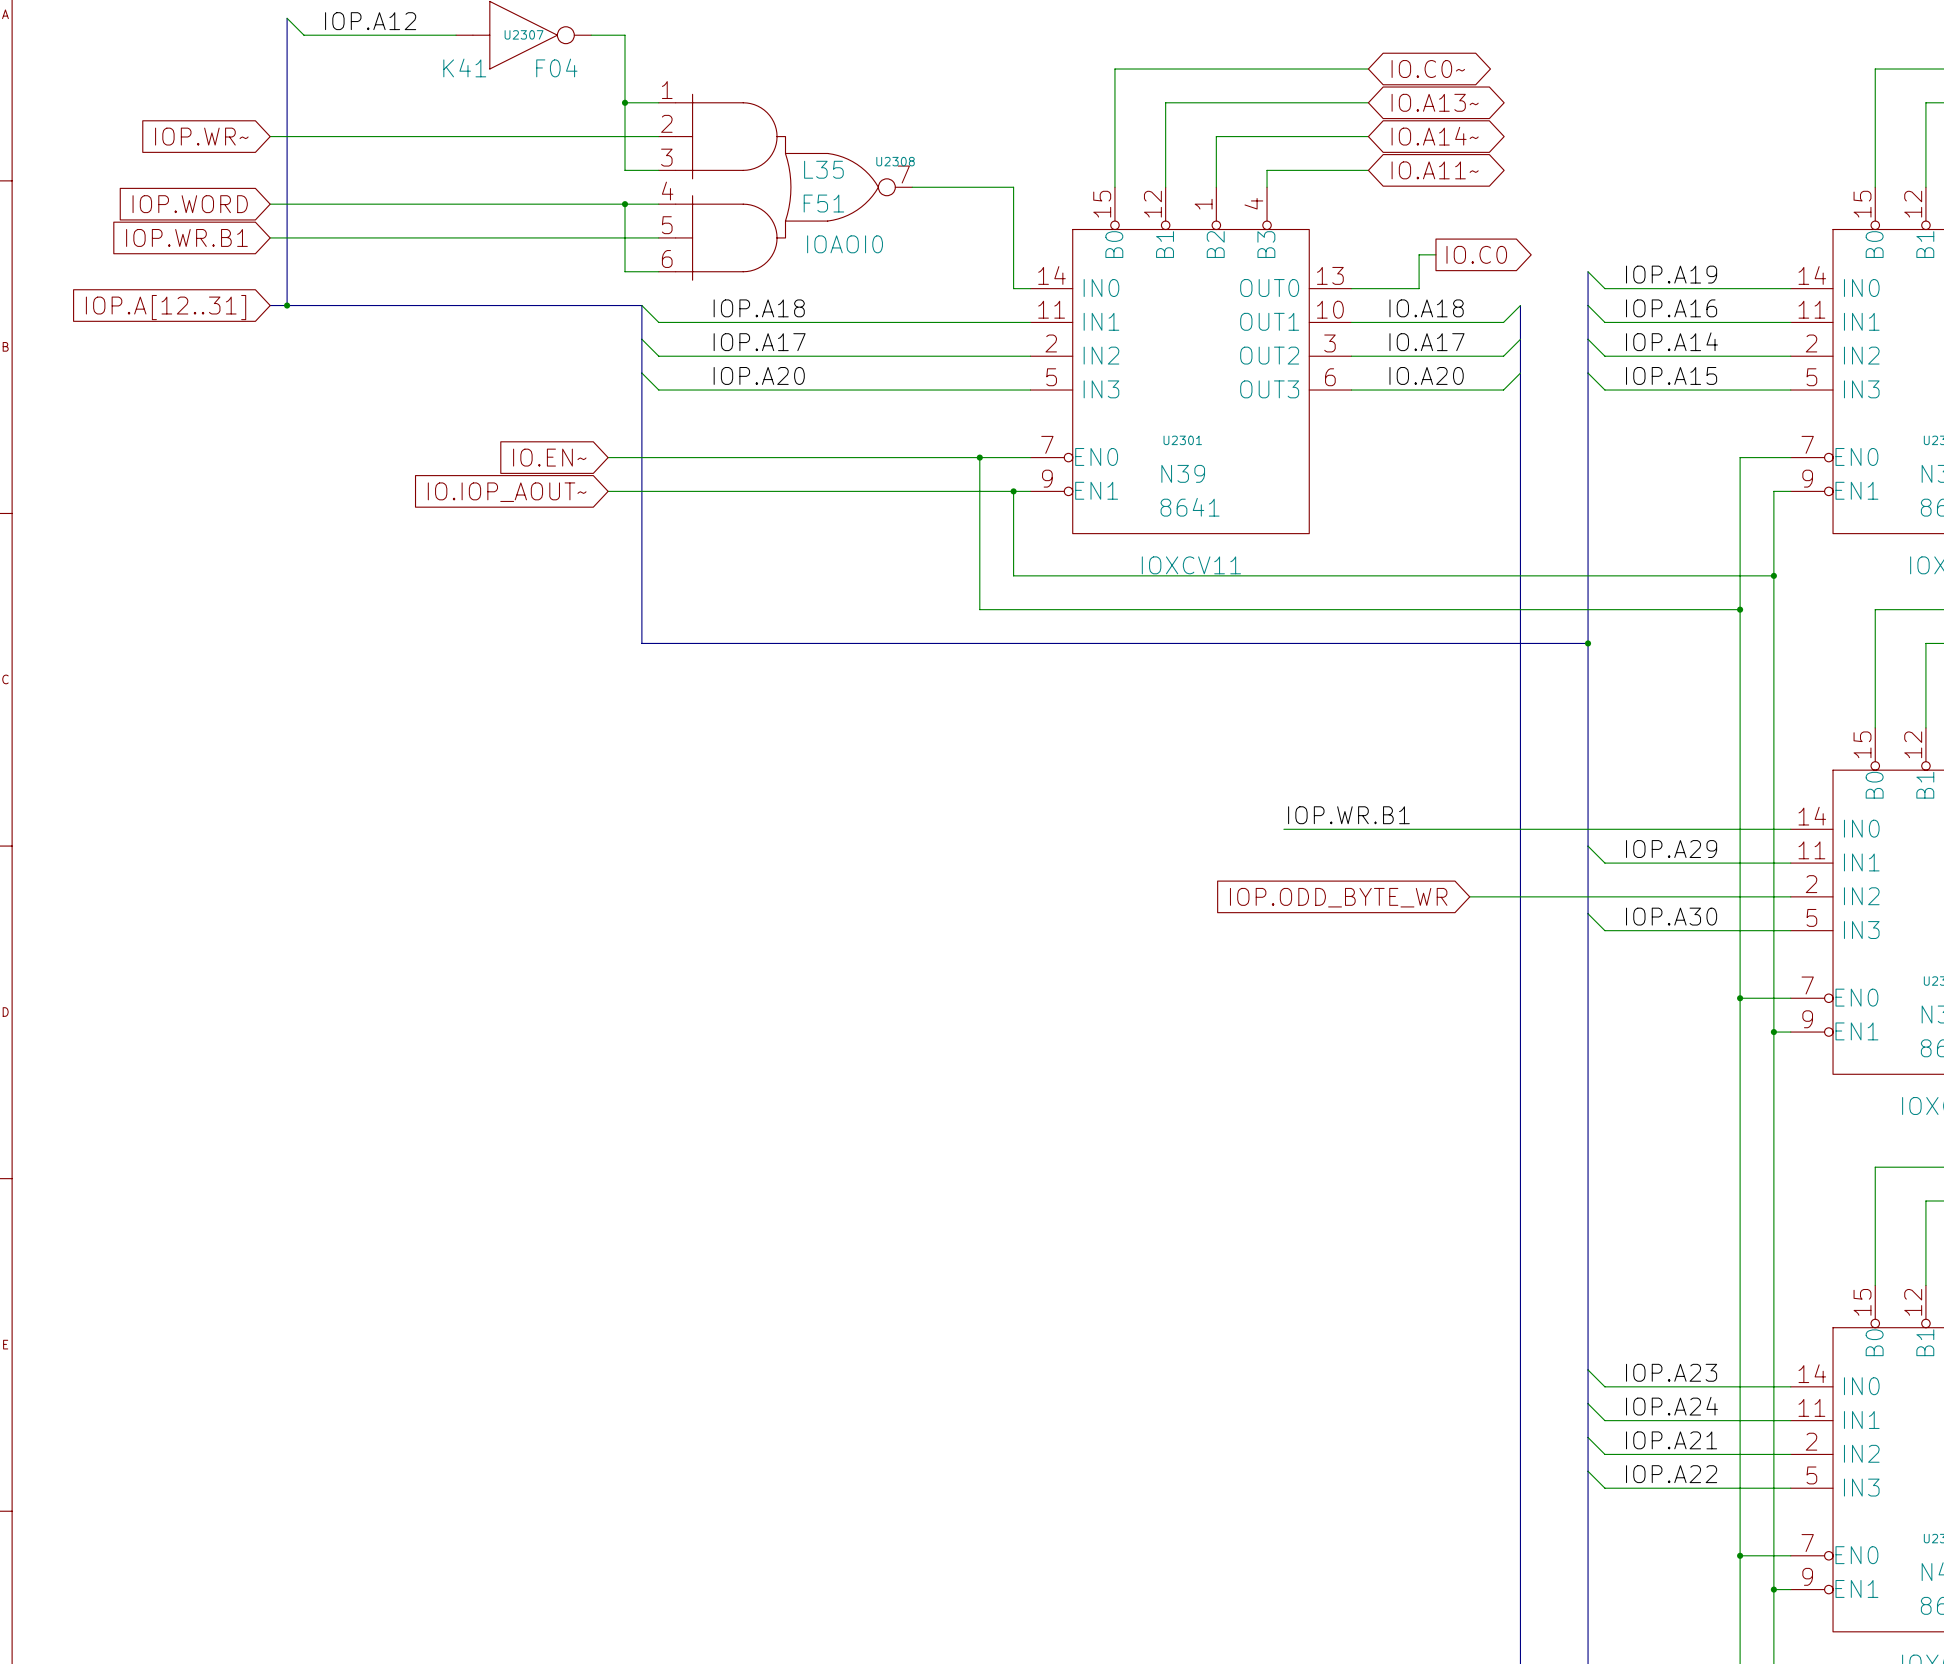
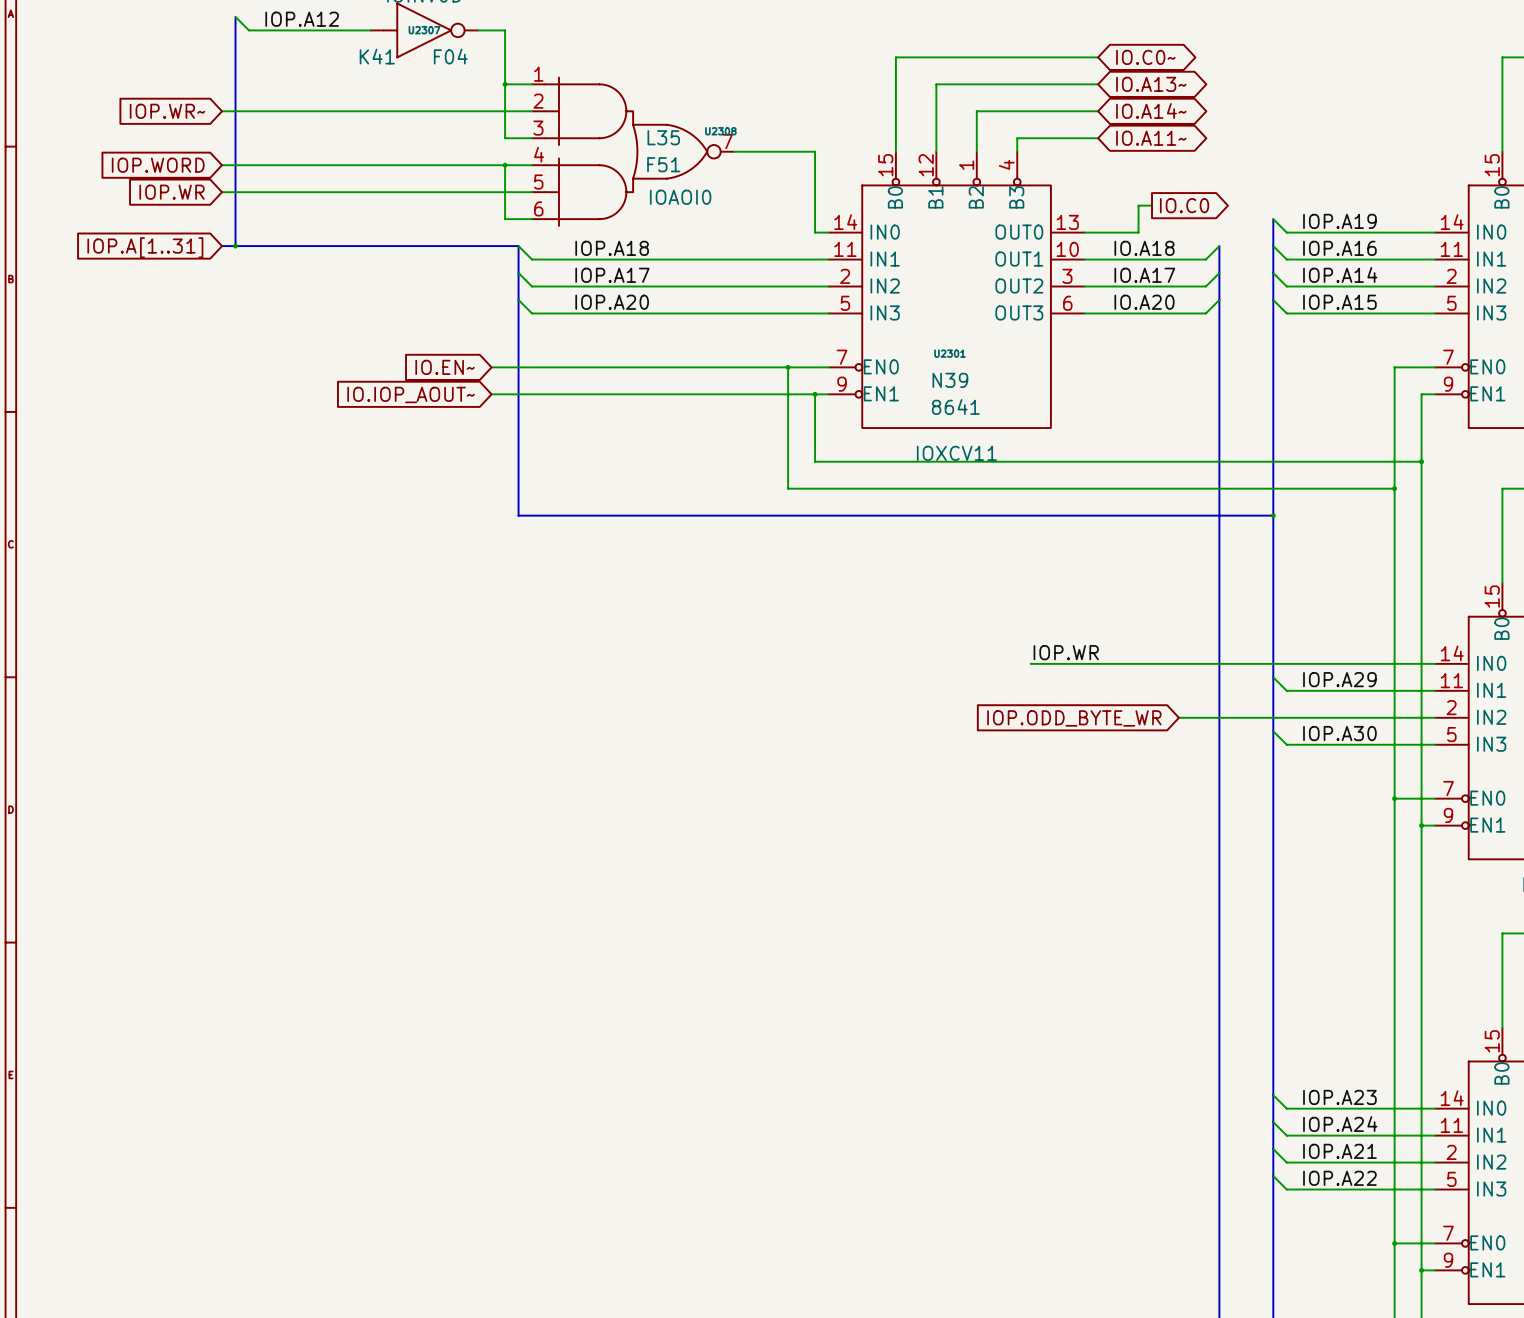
global label: IOP.WR.B1 (186, 237) -> IOP.WR (172, 192)
global label: IOP.A[12..31] (166, 307) -> IOP.A[1..31] (145, 247)
label: IOP.WR.B1 (1348, 815) -> IOP.WR (1066, 652)

